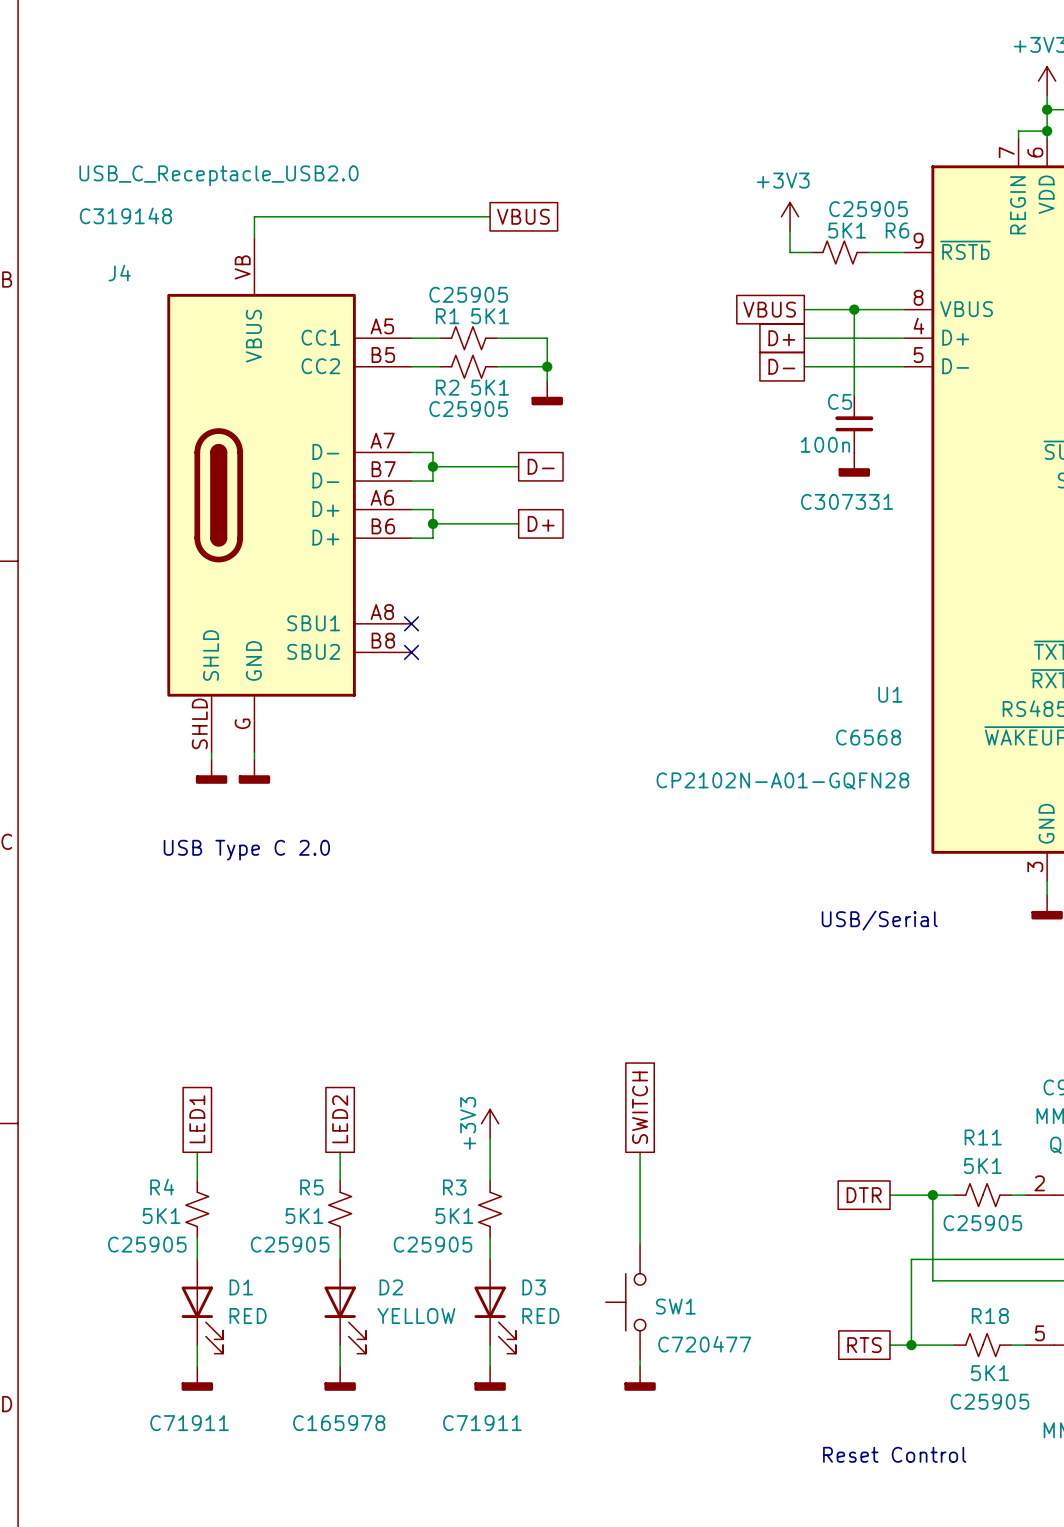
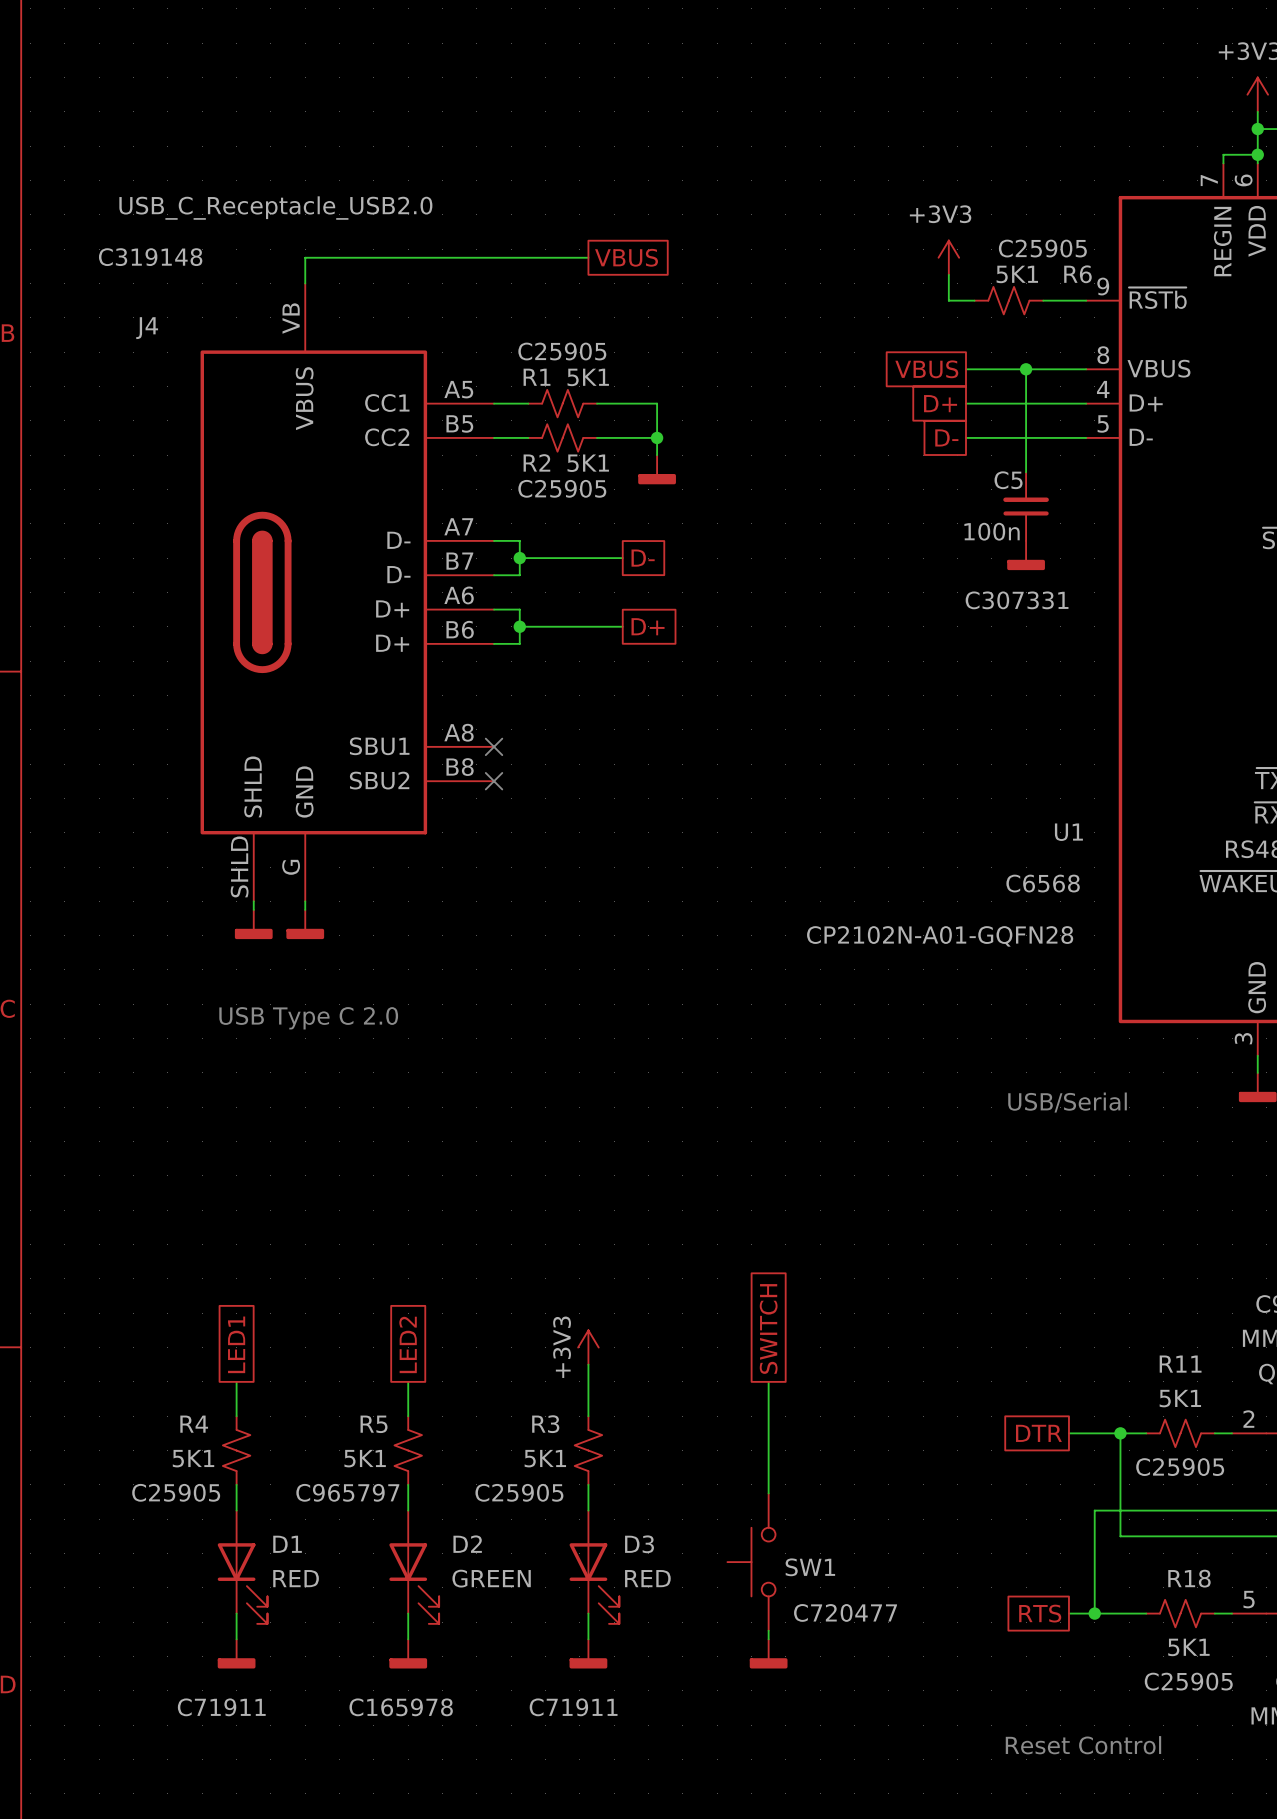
R5 text: C25905 (290, 1244) -> C965797 (347, 1492)
D2 value: YELLOW (416, 1316) -> GREEN (491, 1578)

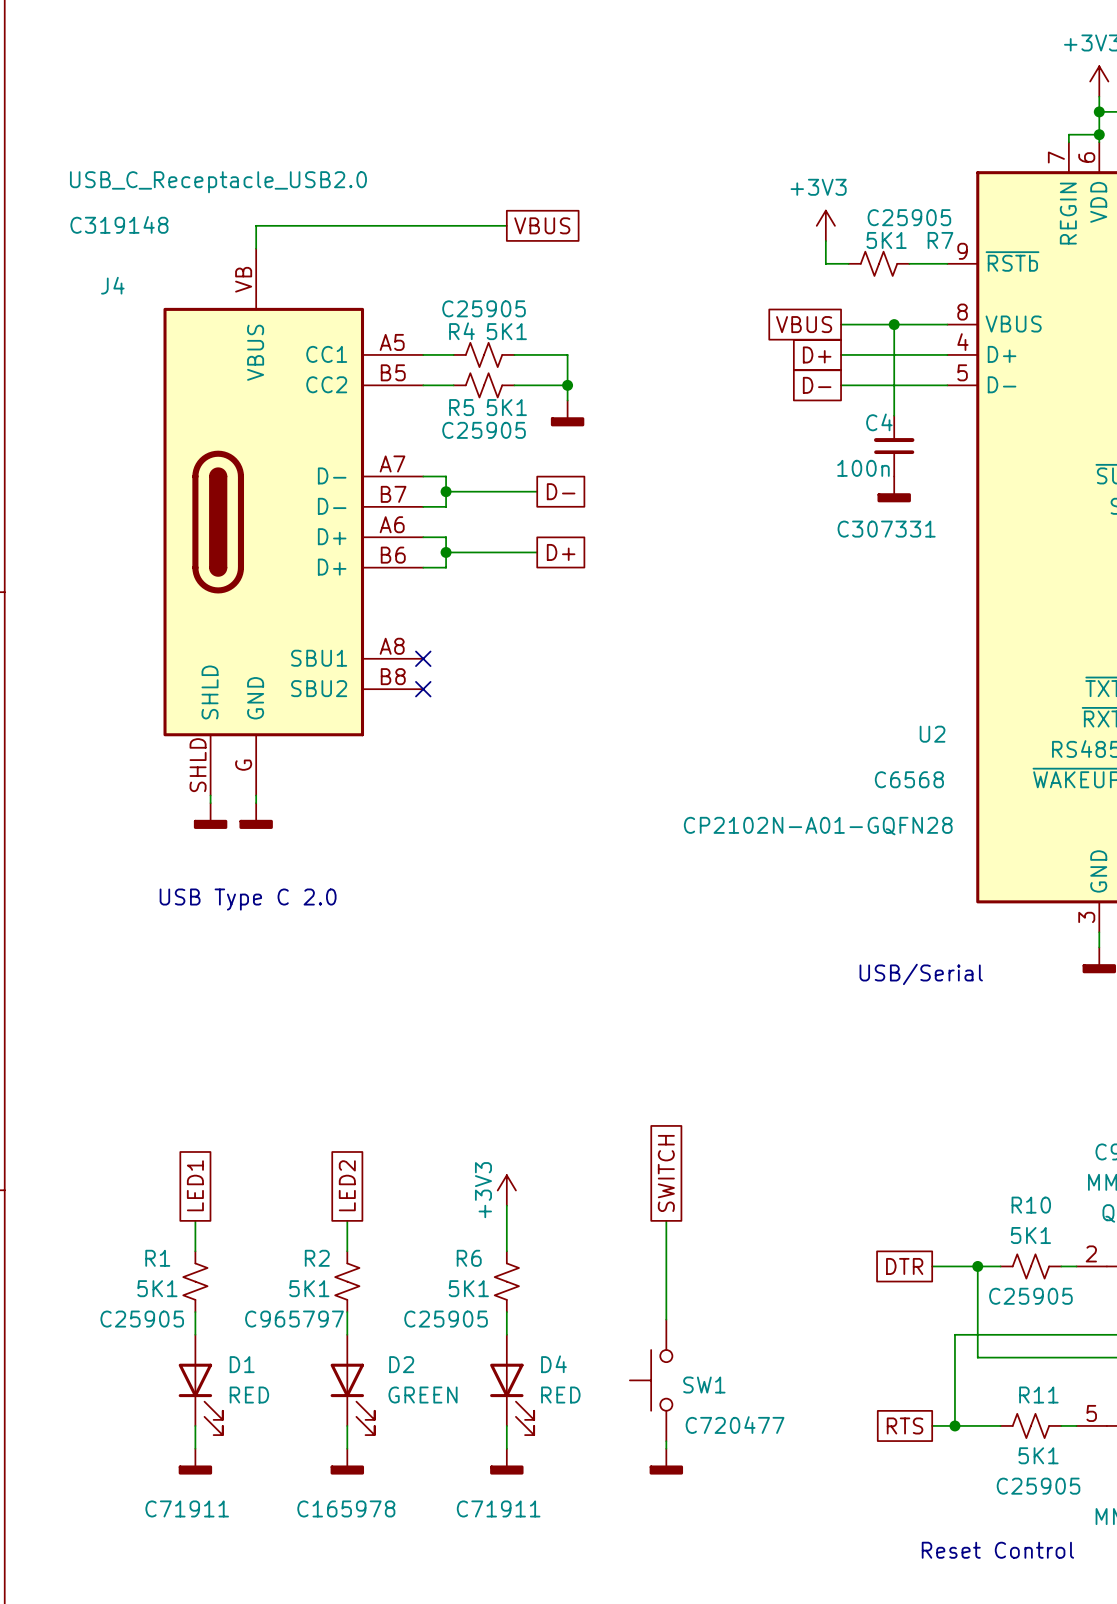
R6 name: R6 (1077, 274) -> R7 (940, 240)
R1 name: R1 (537, 377) -> R4 (461, 331)
R2 name: R2 (536, 462) -> R5 (461, 407)
C5 name: C5 (1008, 480) -> C4 (879, 422)
U1 name: U1 (1068, 832) -> U2 (932, 734)
R11 name: R11 (1180, 1364) -> R10 (1031, 1205)
R4 name: R4 (194, 1424) -> R1 (157, 1258)
R5 name: R5 (374, 1424) -> R2 (317, 1258)
R3 name: R3 (545, 1424) -> R6 (469, 1258)
D3 name: D3 (639, 1544) -> D4 (553, 1364)
R18 name: R18 (1189, 1578) -> R11 (1038, 1395)
text position: Reset Control (1083, 1745) -> Reset Control (997, 1550)

